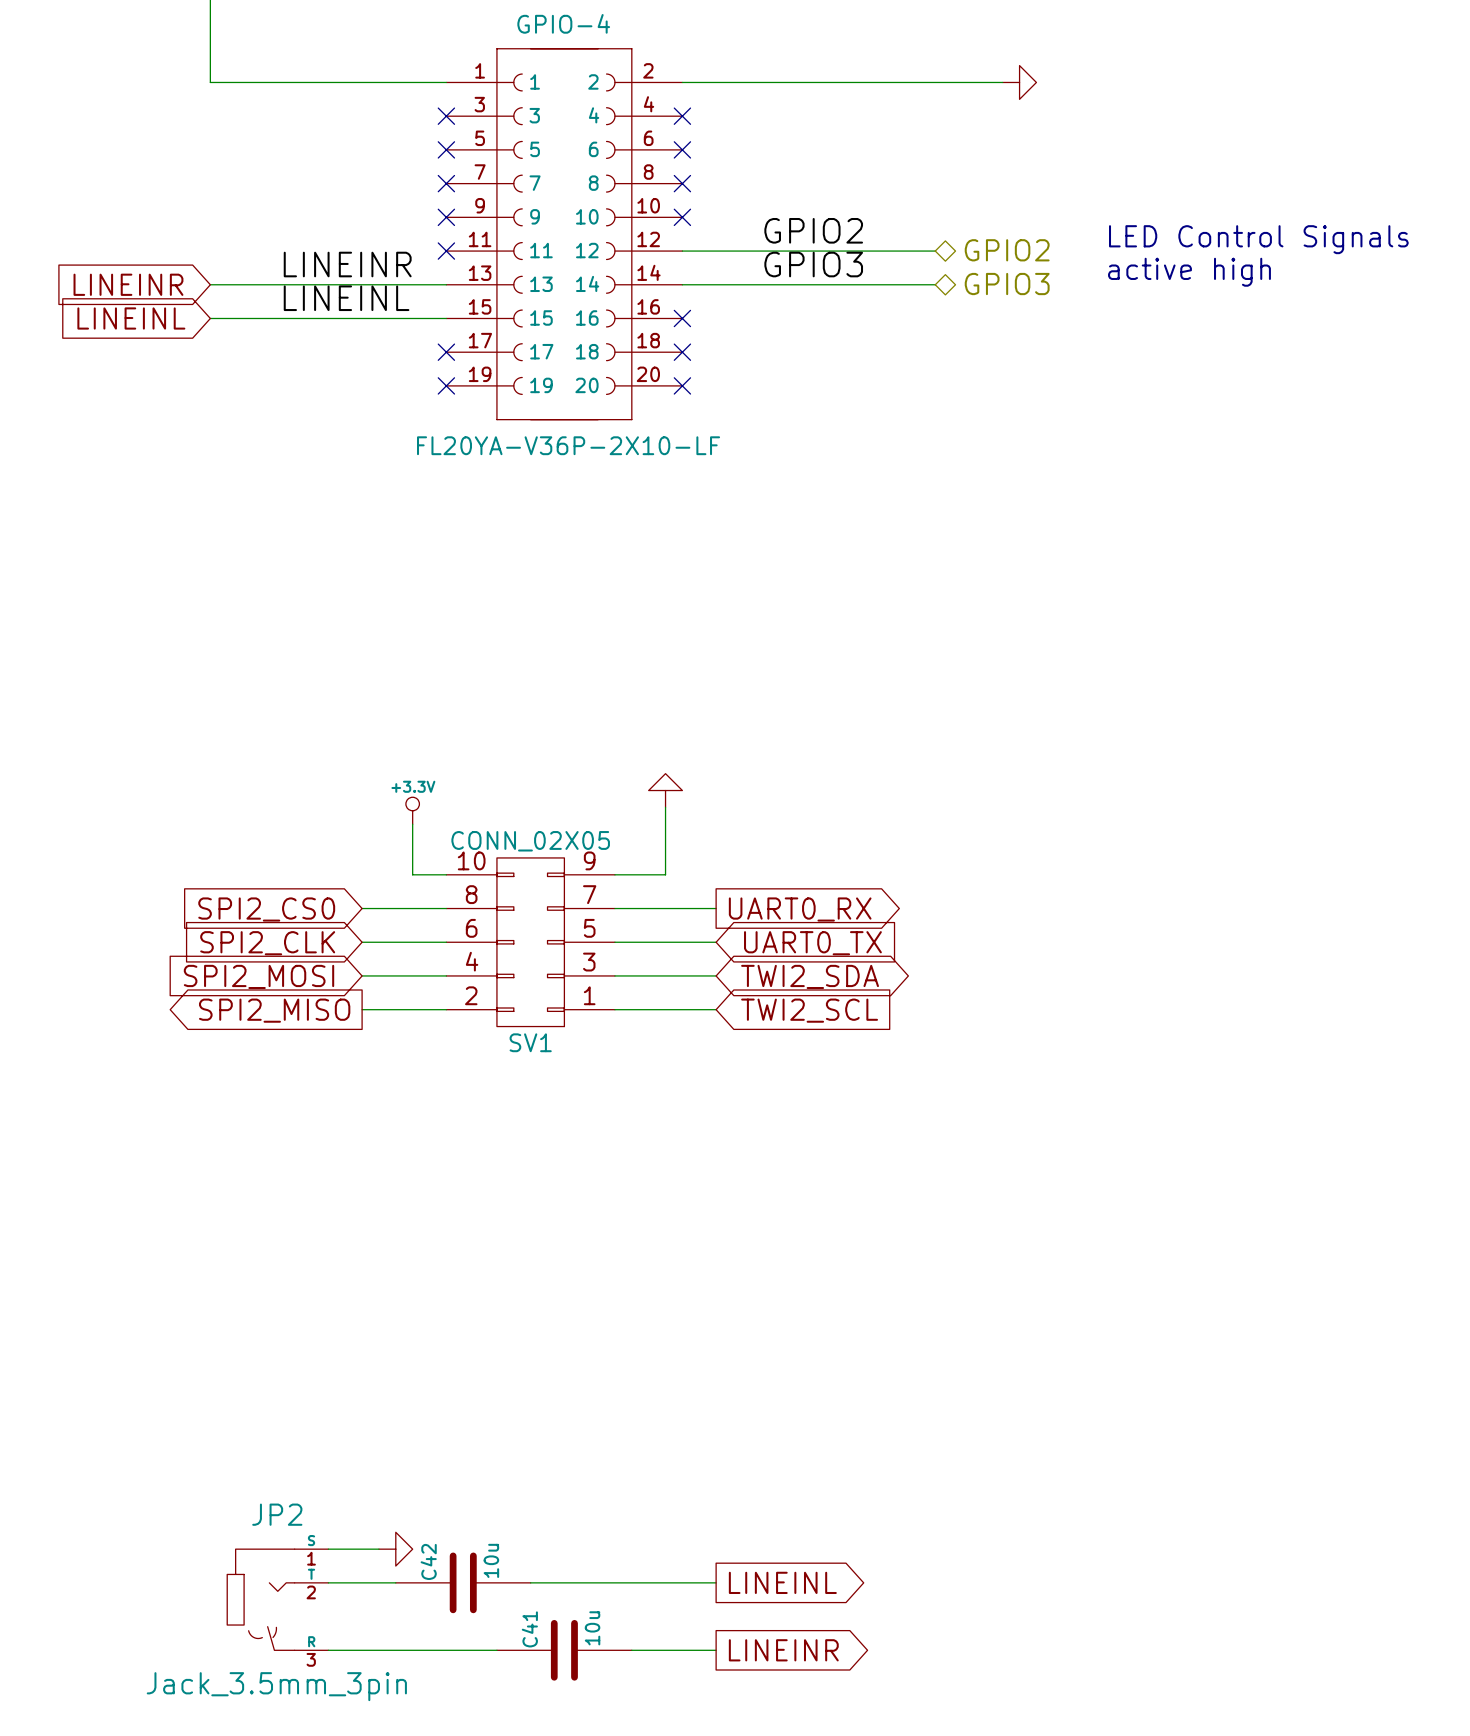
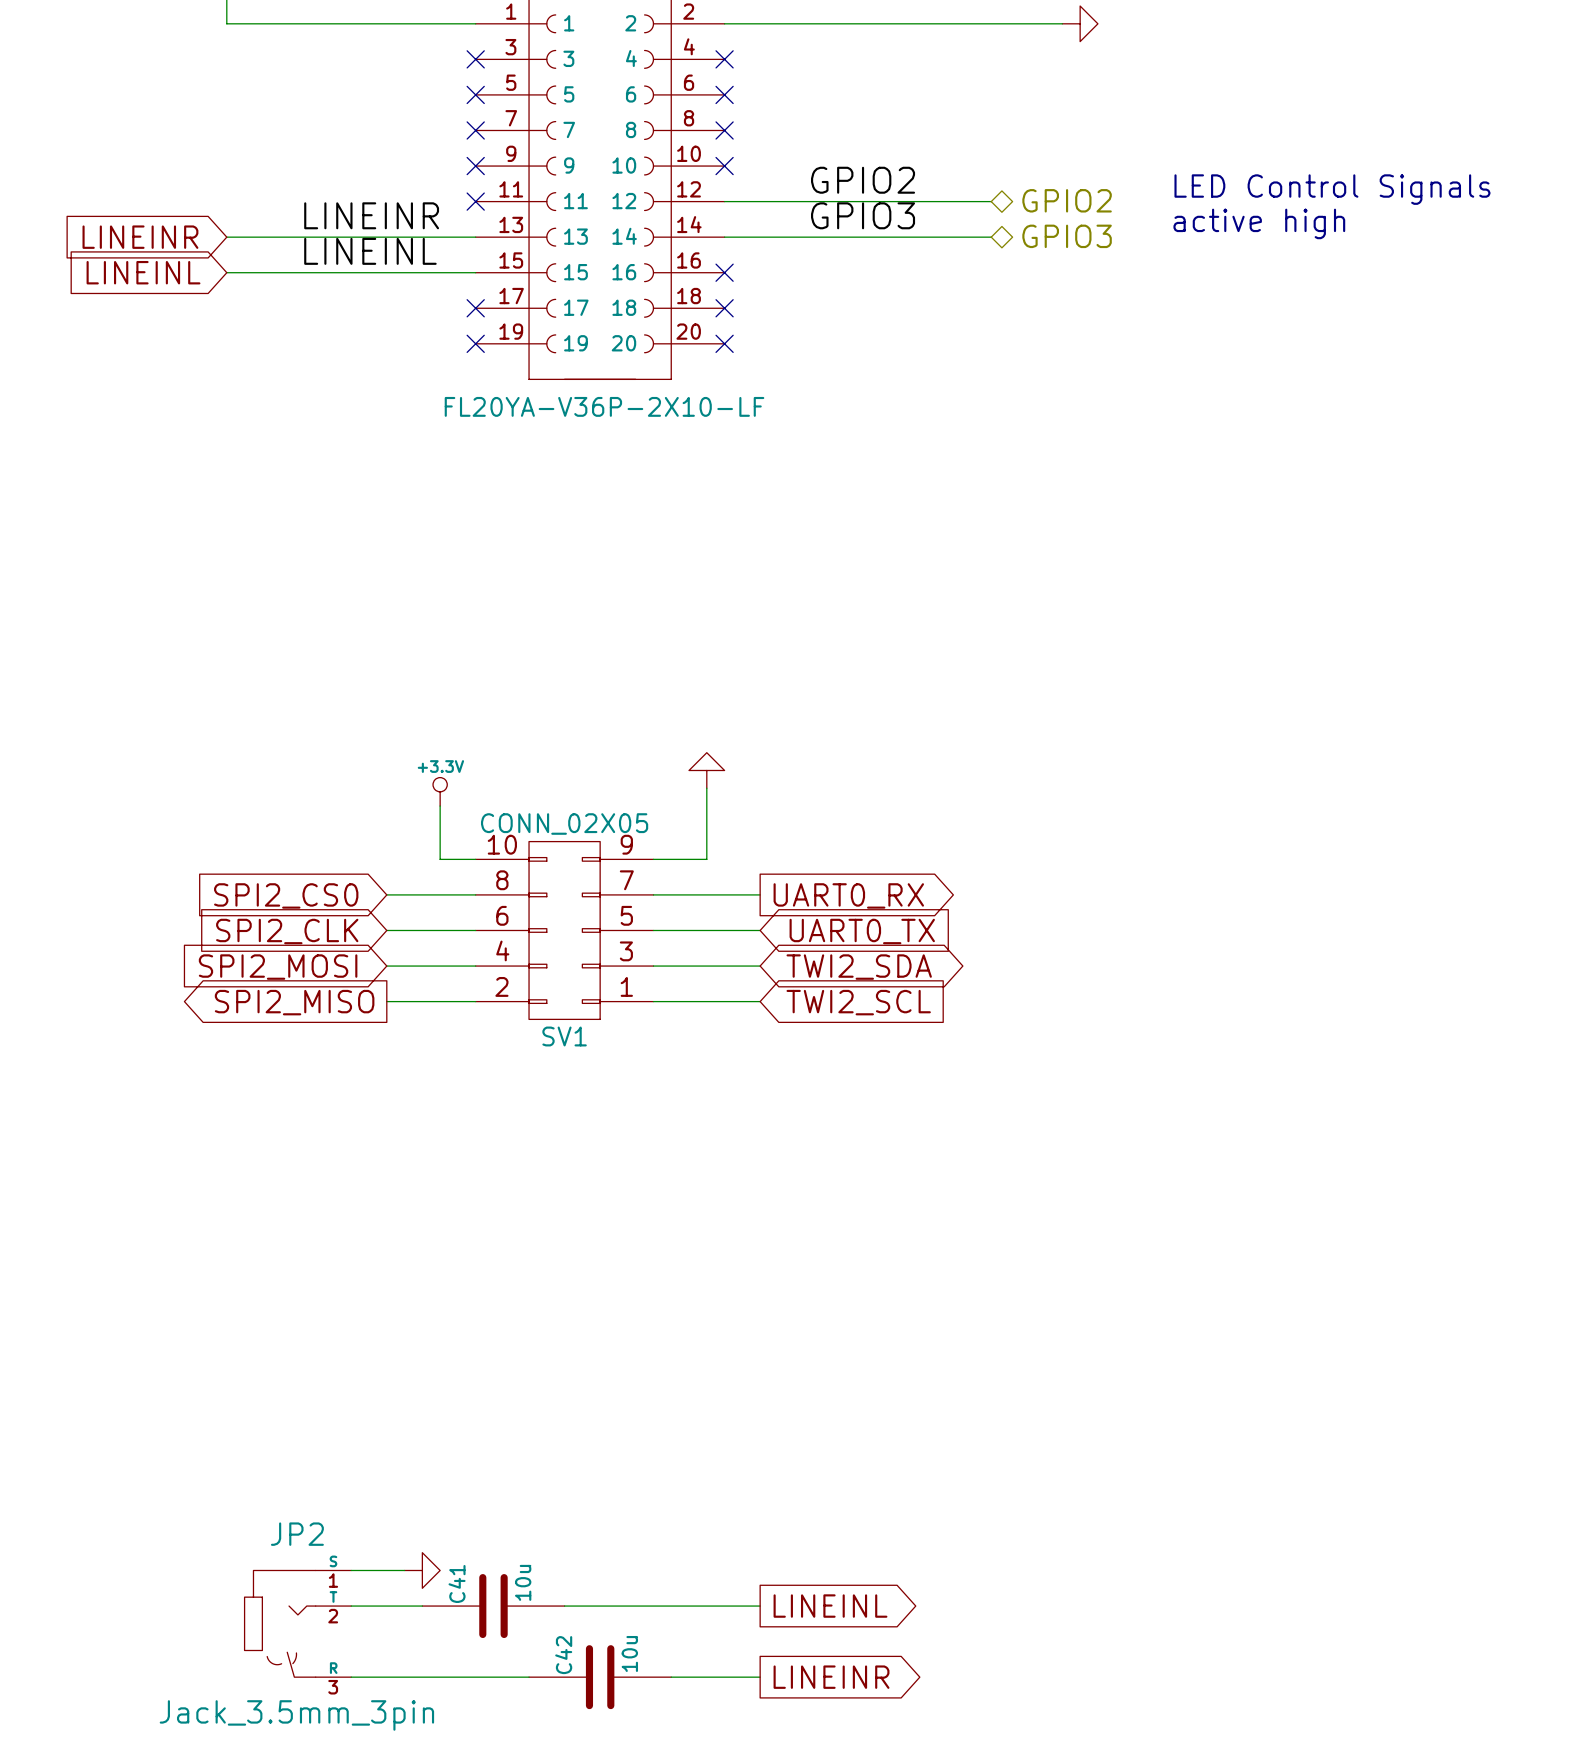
C42 name: C42 (428, 1561) -> C41 (457, 1583)
C41 name: C41 (529, 1629) -> C42 (563, 1655)

